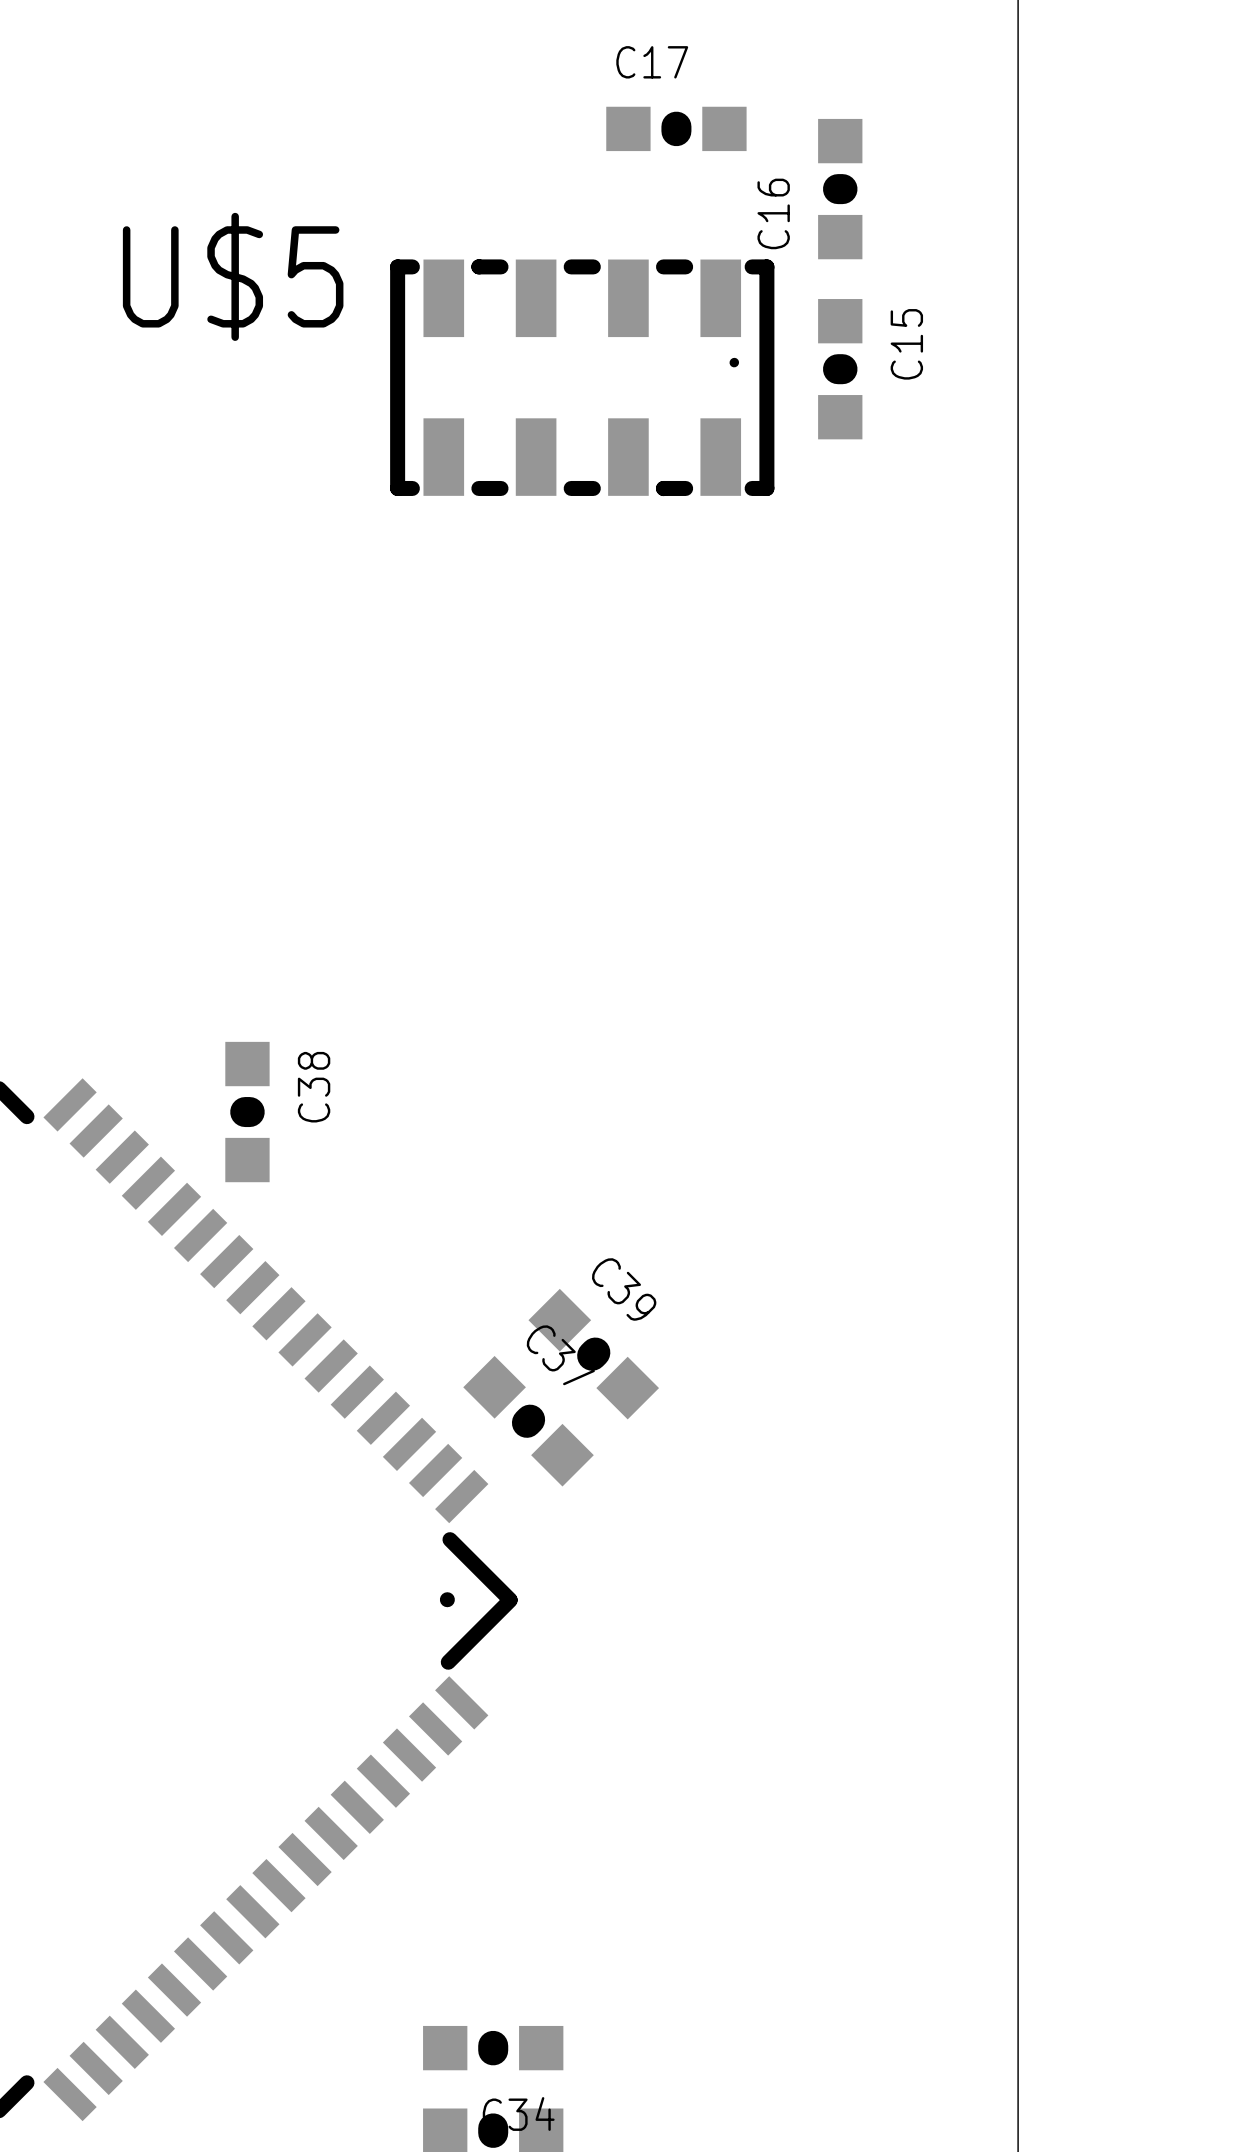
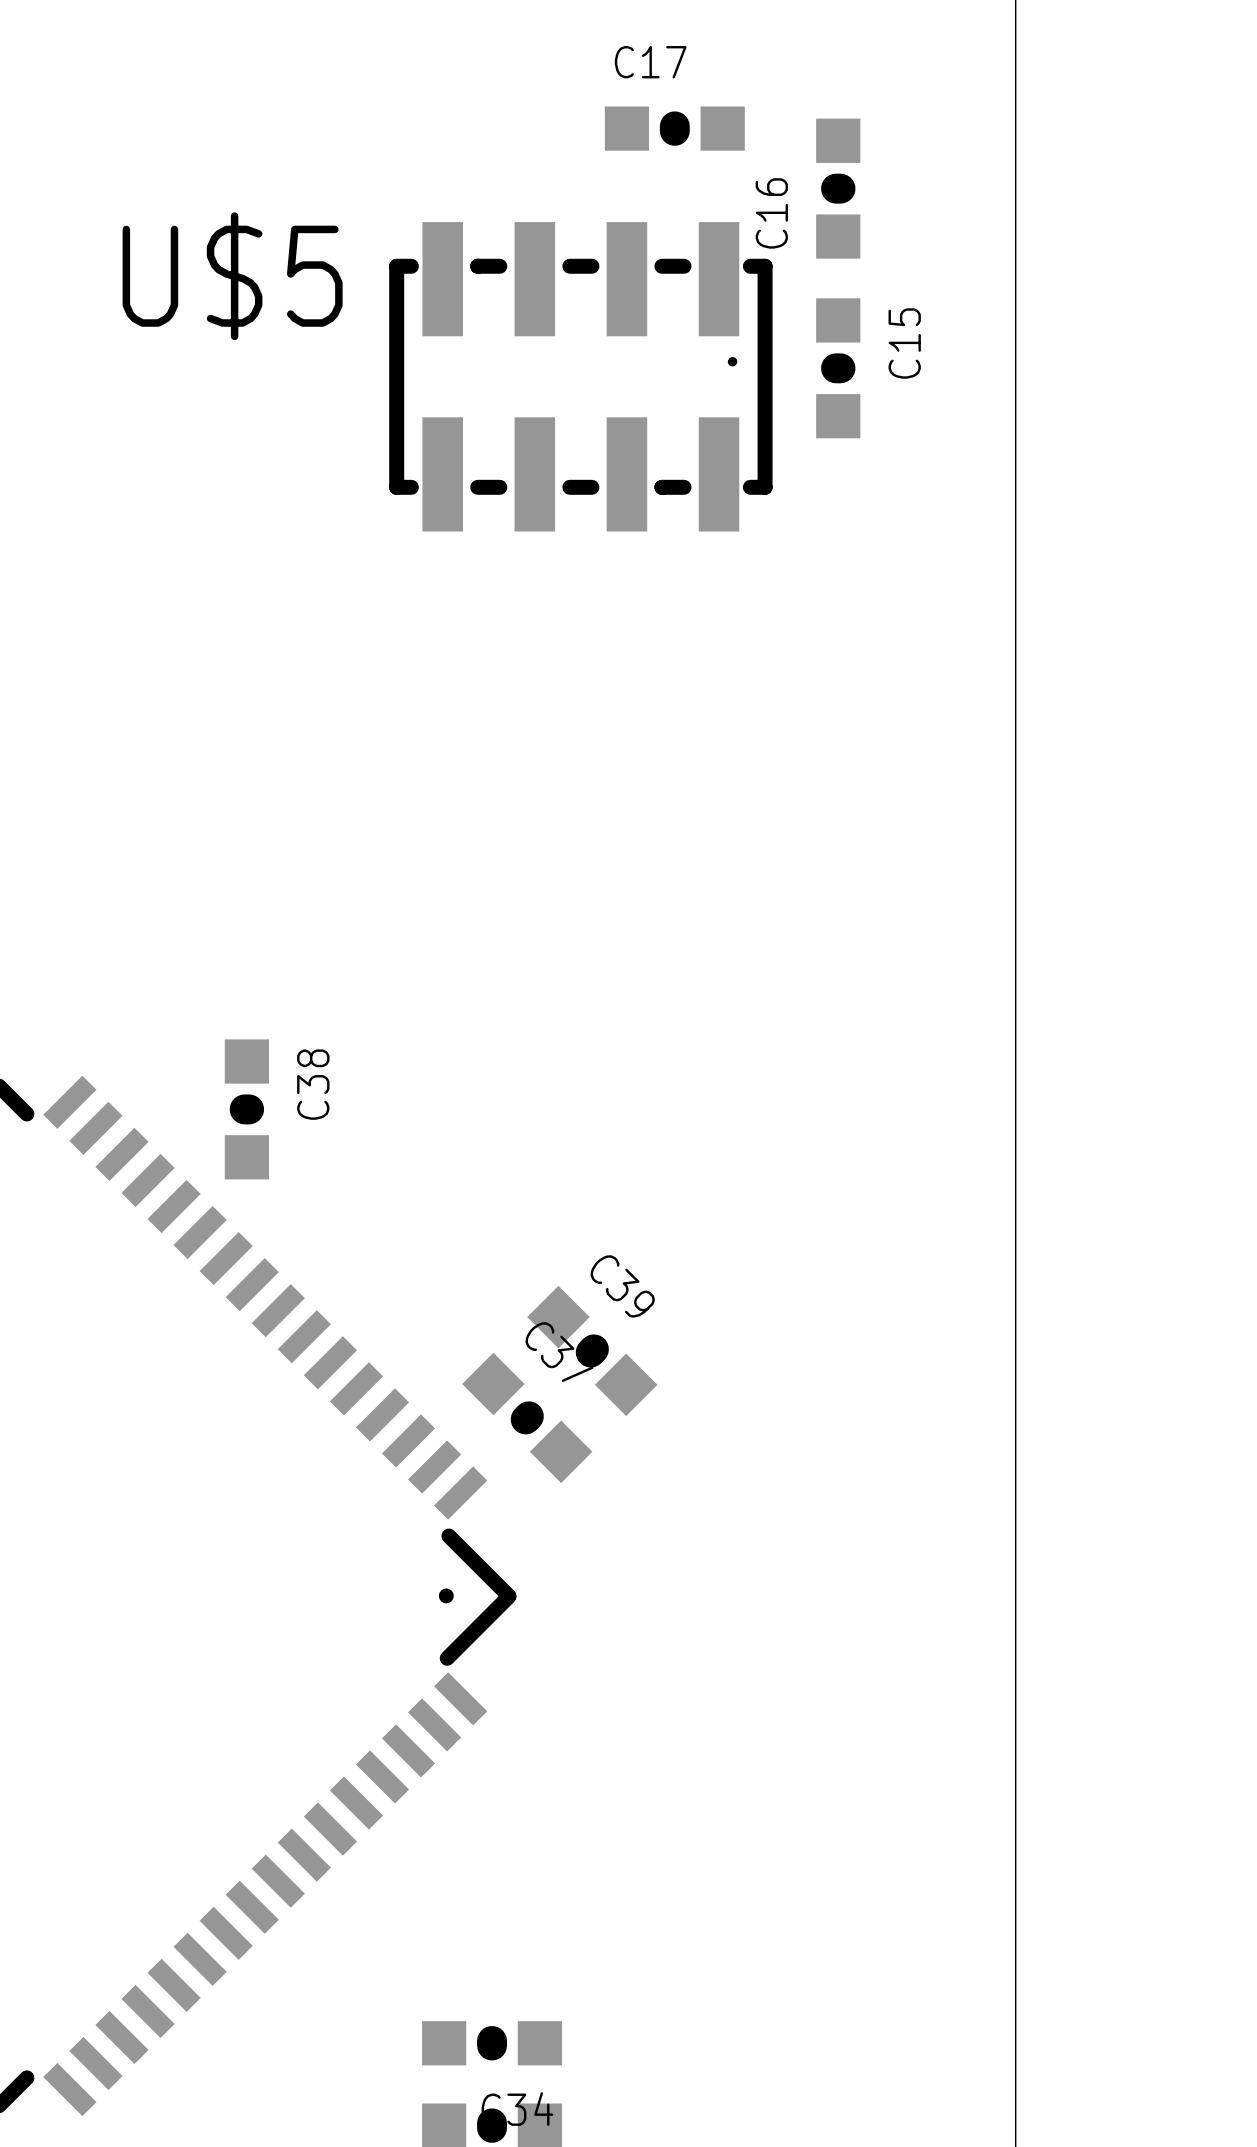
U$5 footprint: [390, 259, 775, 497] -> [389, 222, 773, 532]

